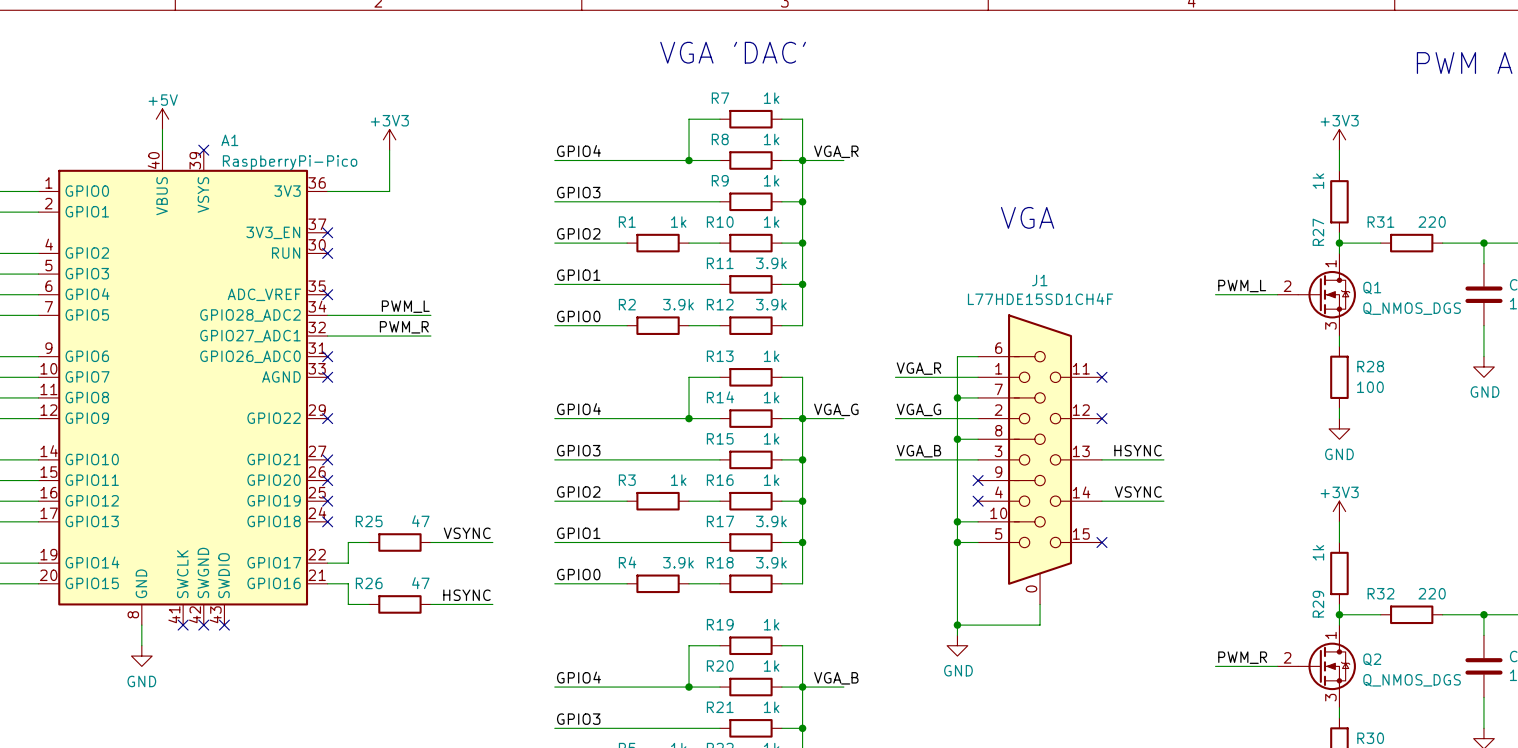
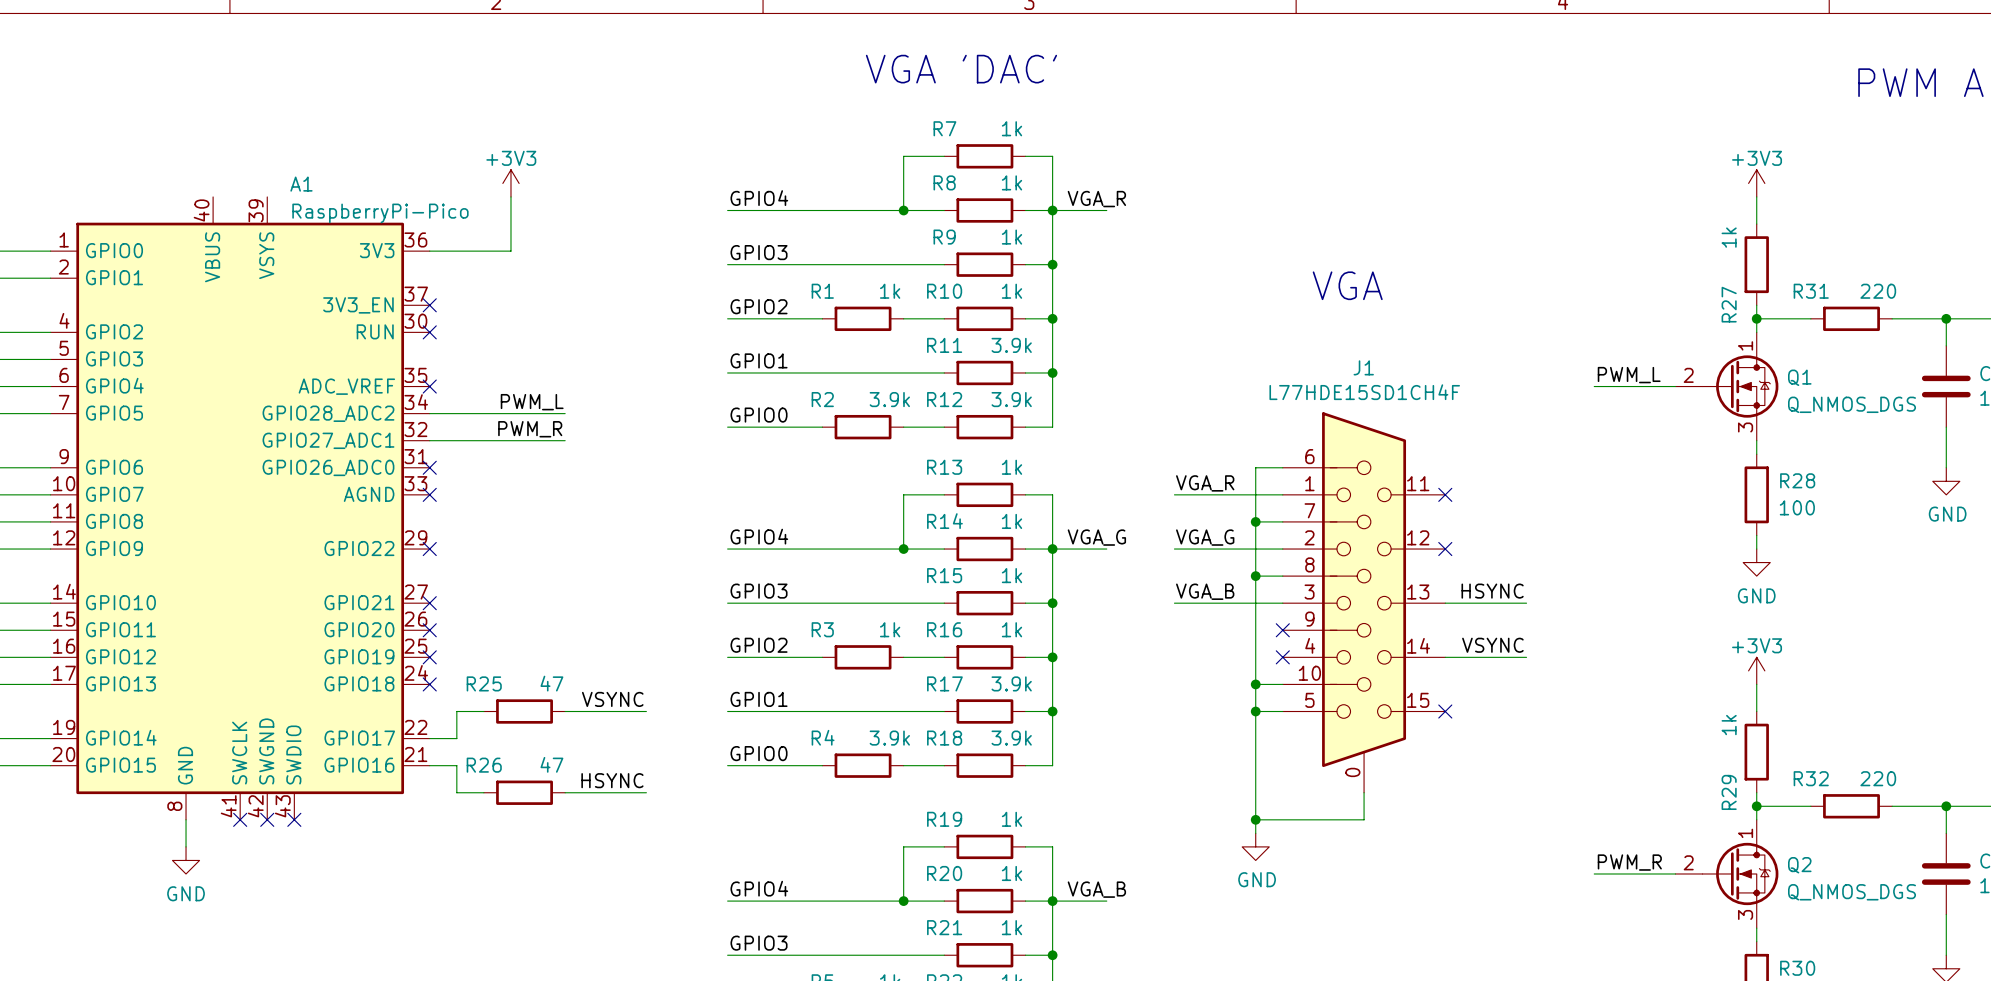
power symbol: +5V (162, 119) -> none
wire: (162, 129) (162, 150) -> none
no-connect mark: (203, 150) -> none

